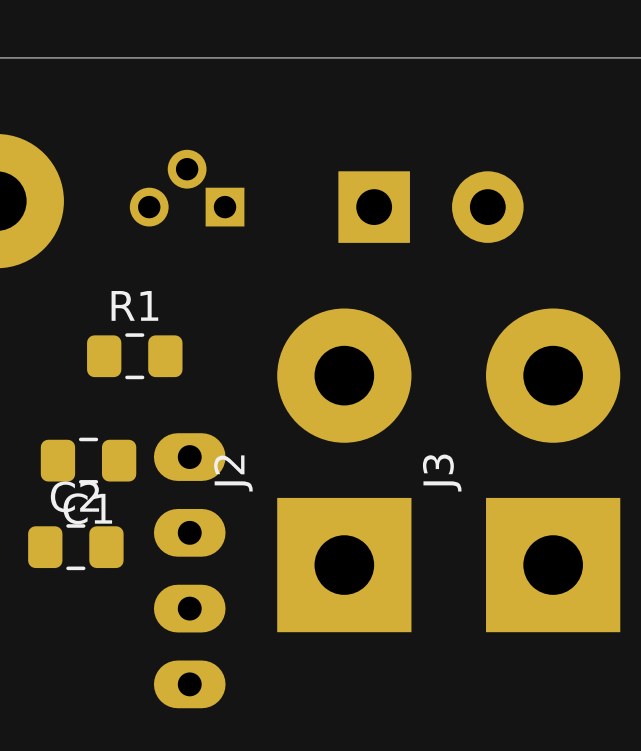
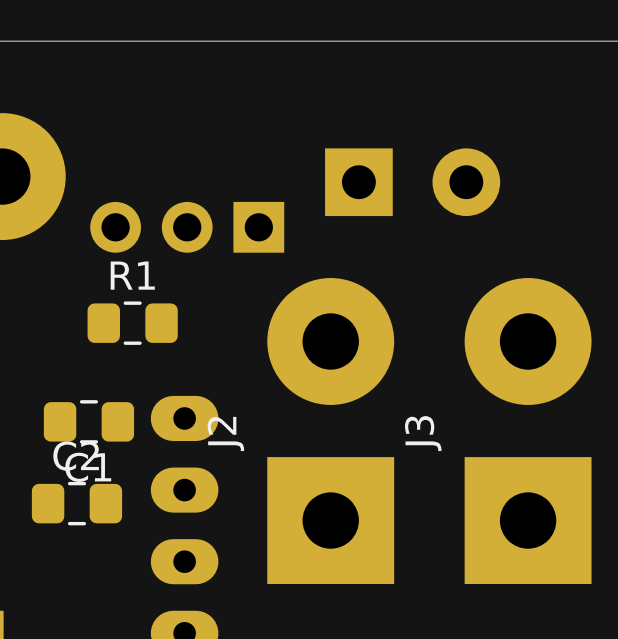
part: (187, 188) -> none
part: none -> (187, 227)

